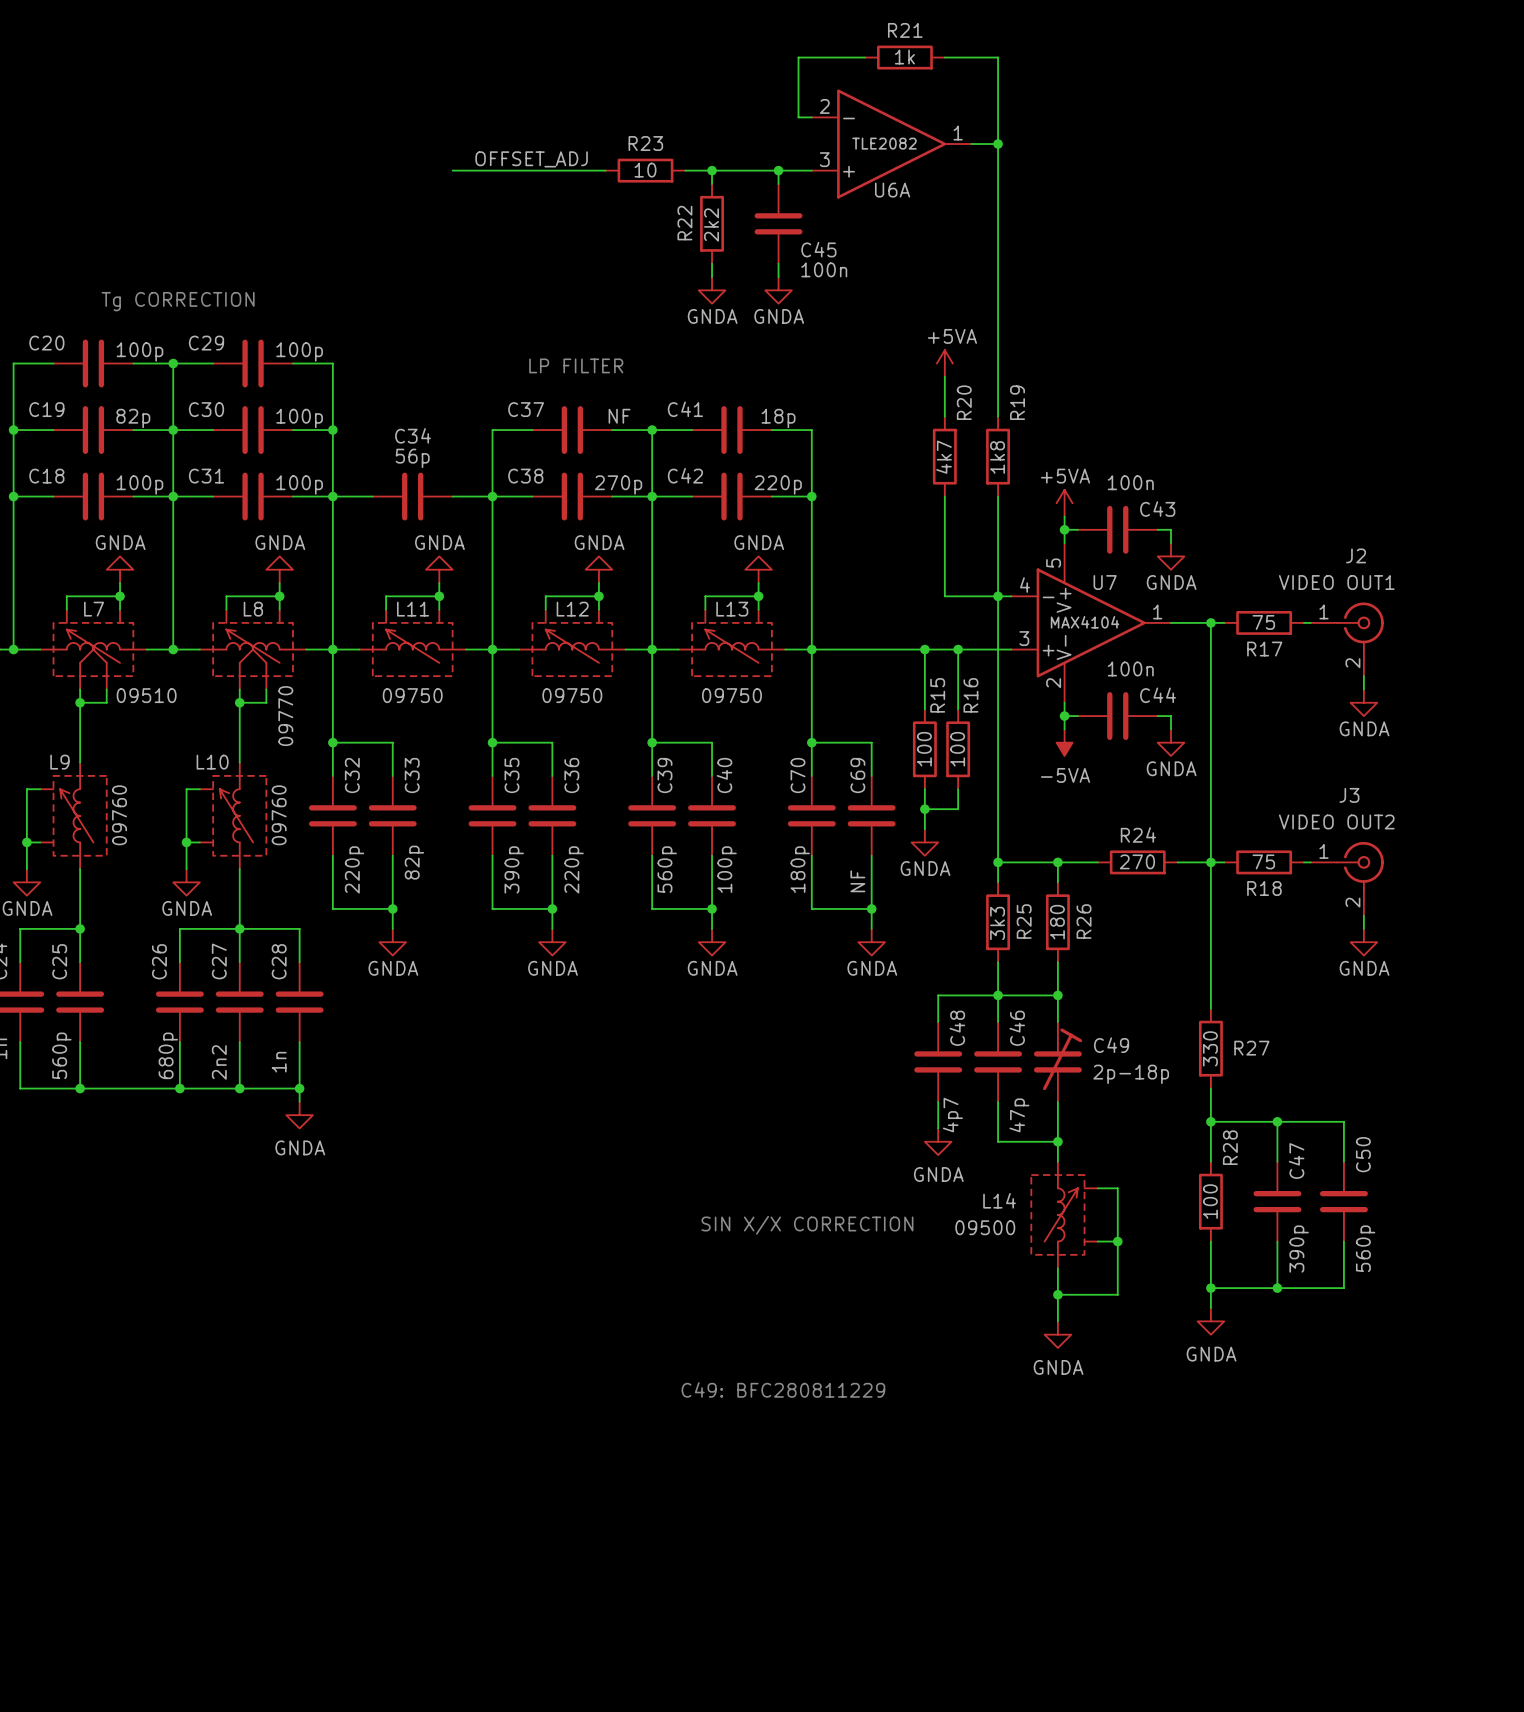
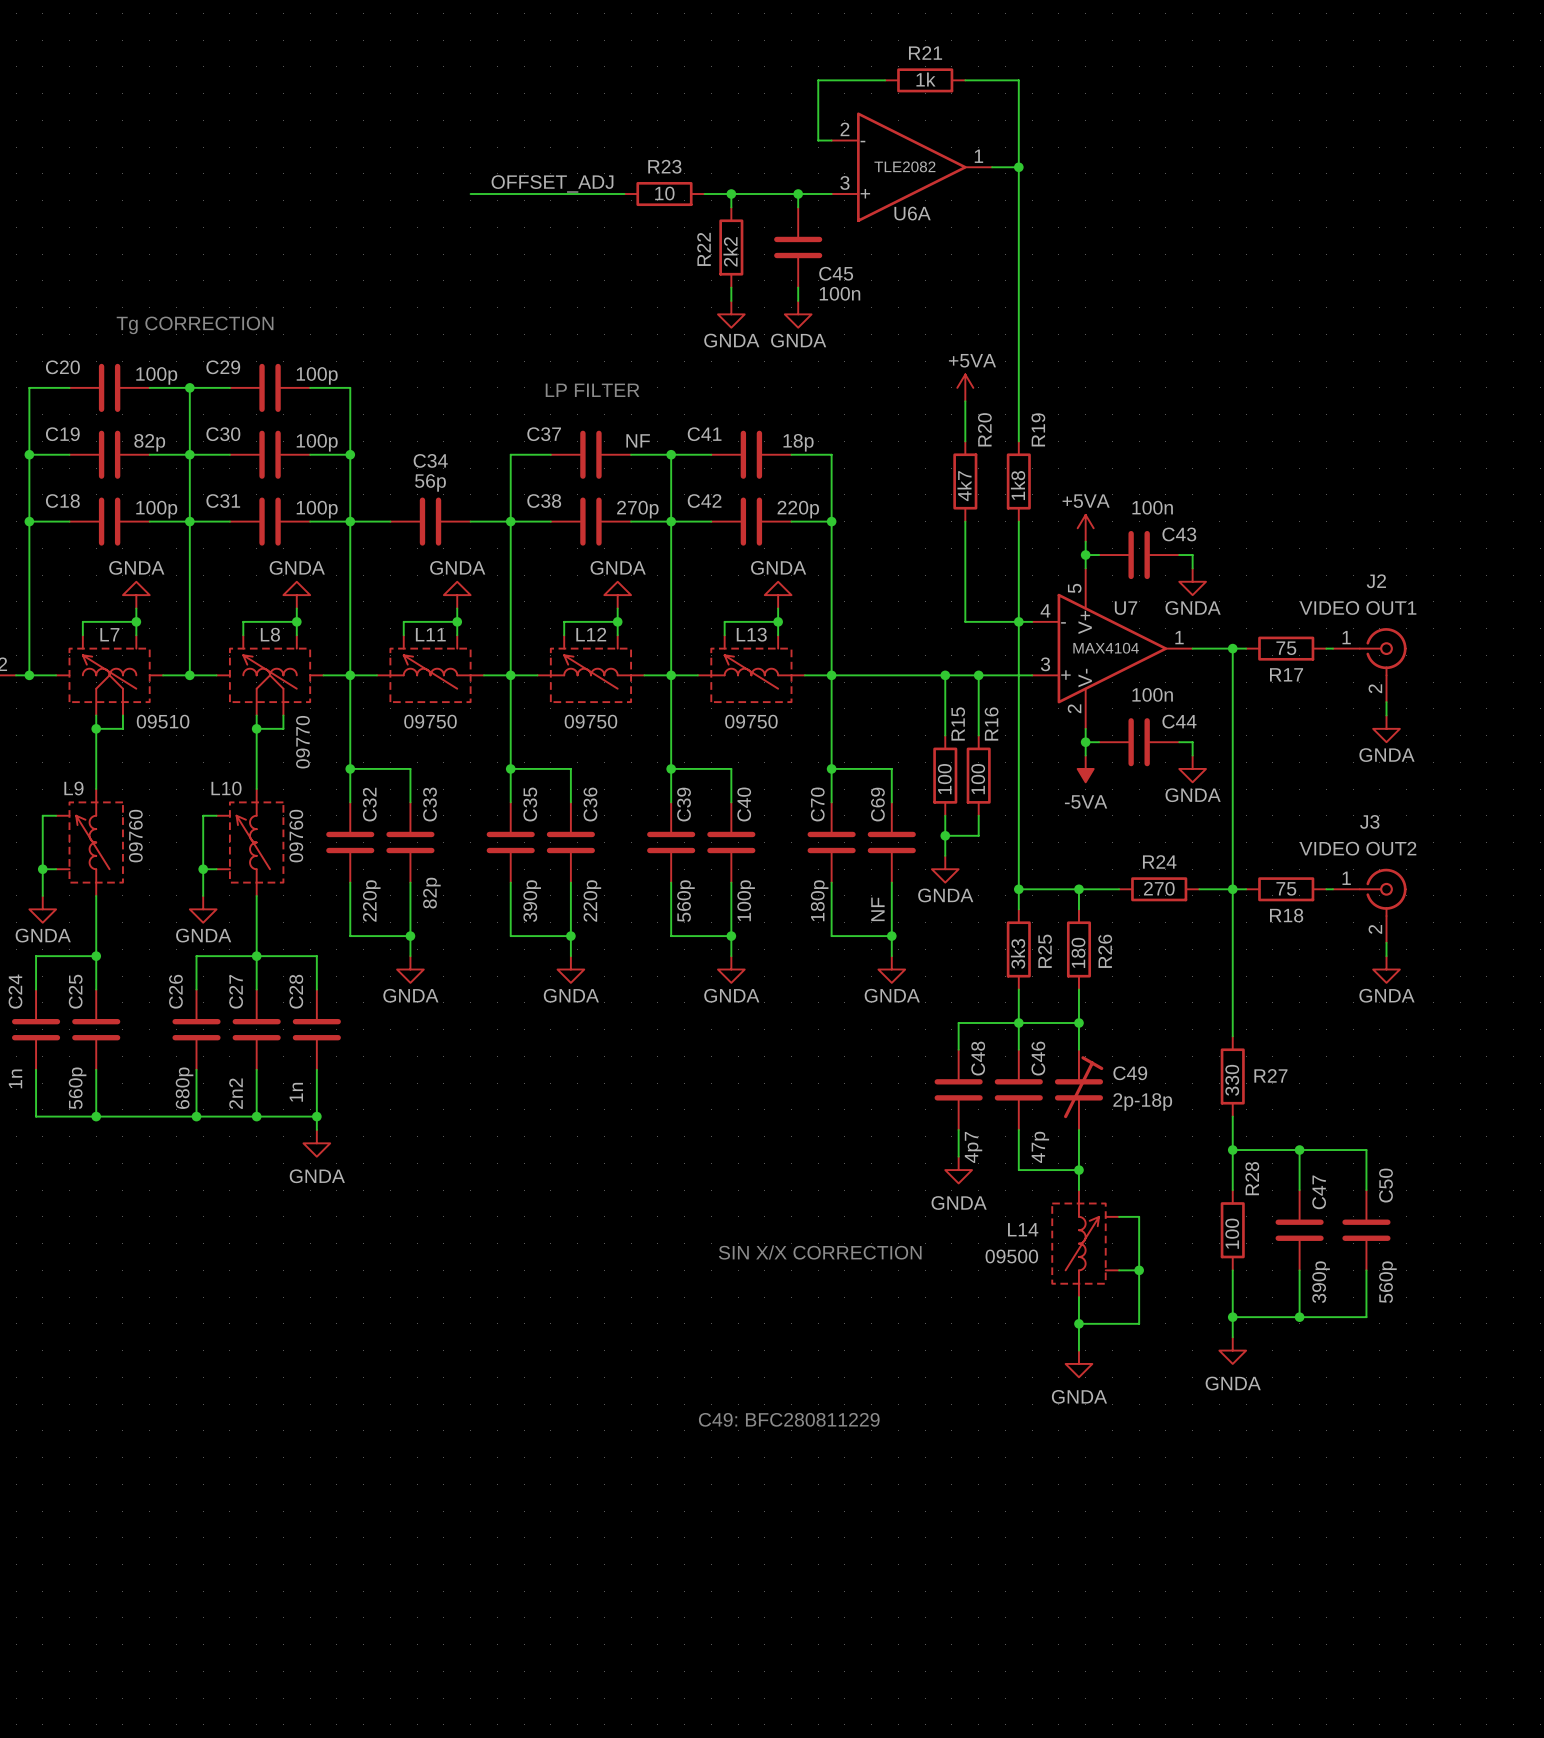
L7 symbol: [40, 609, 147, 690] -> [56, 635, 164, 716]
L8 symbol: [199, 609, 307, 690] -> [216, 635, 324, 716]

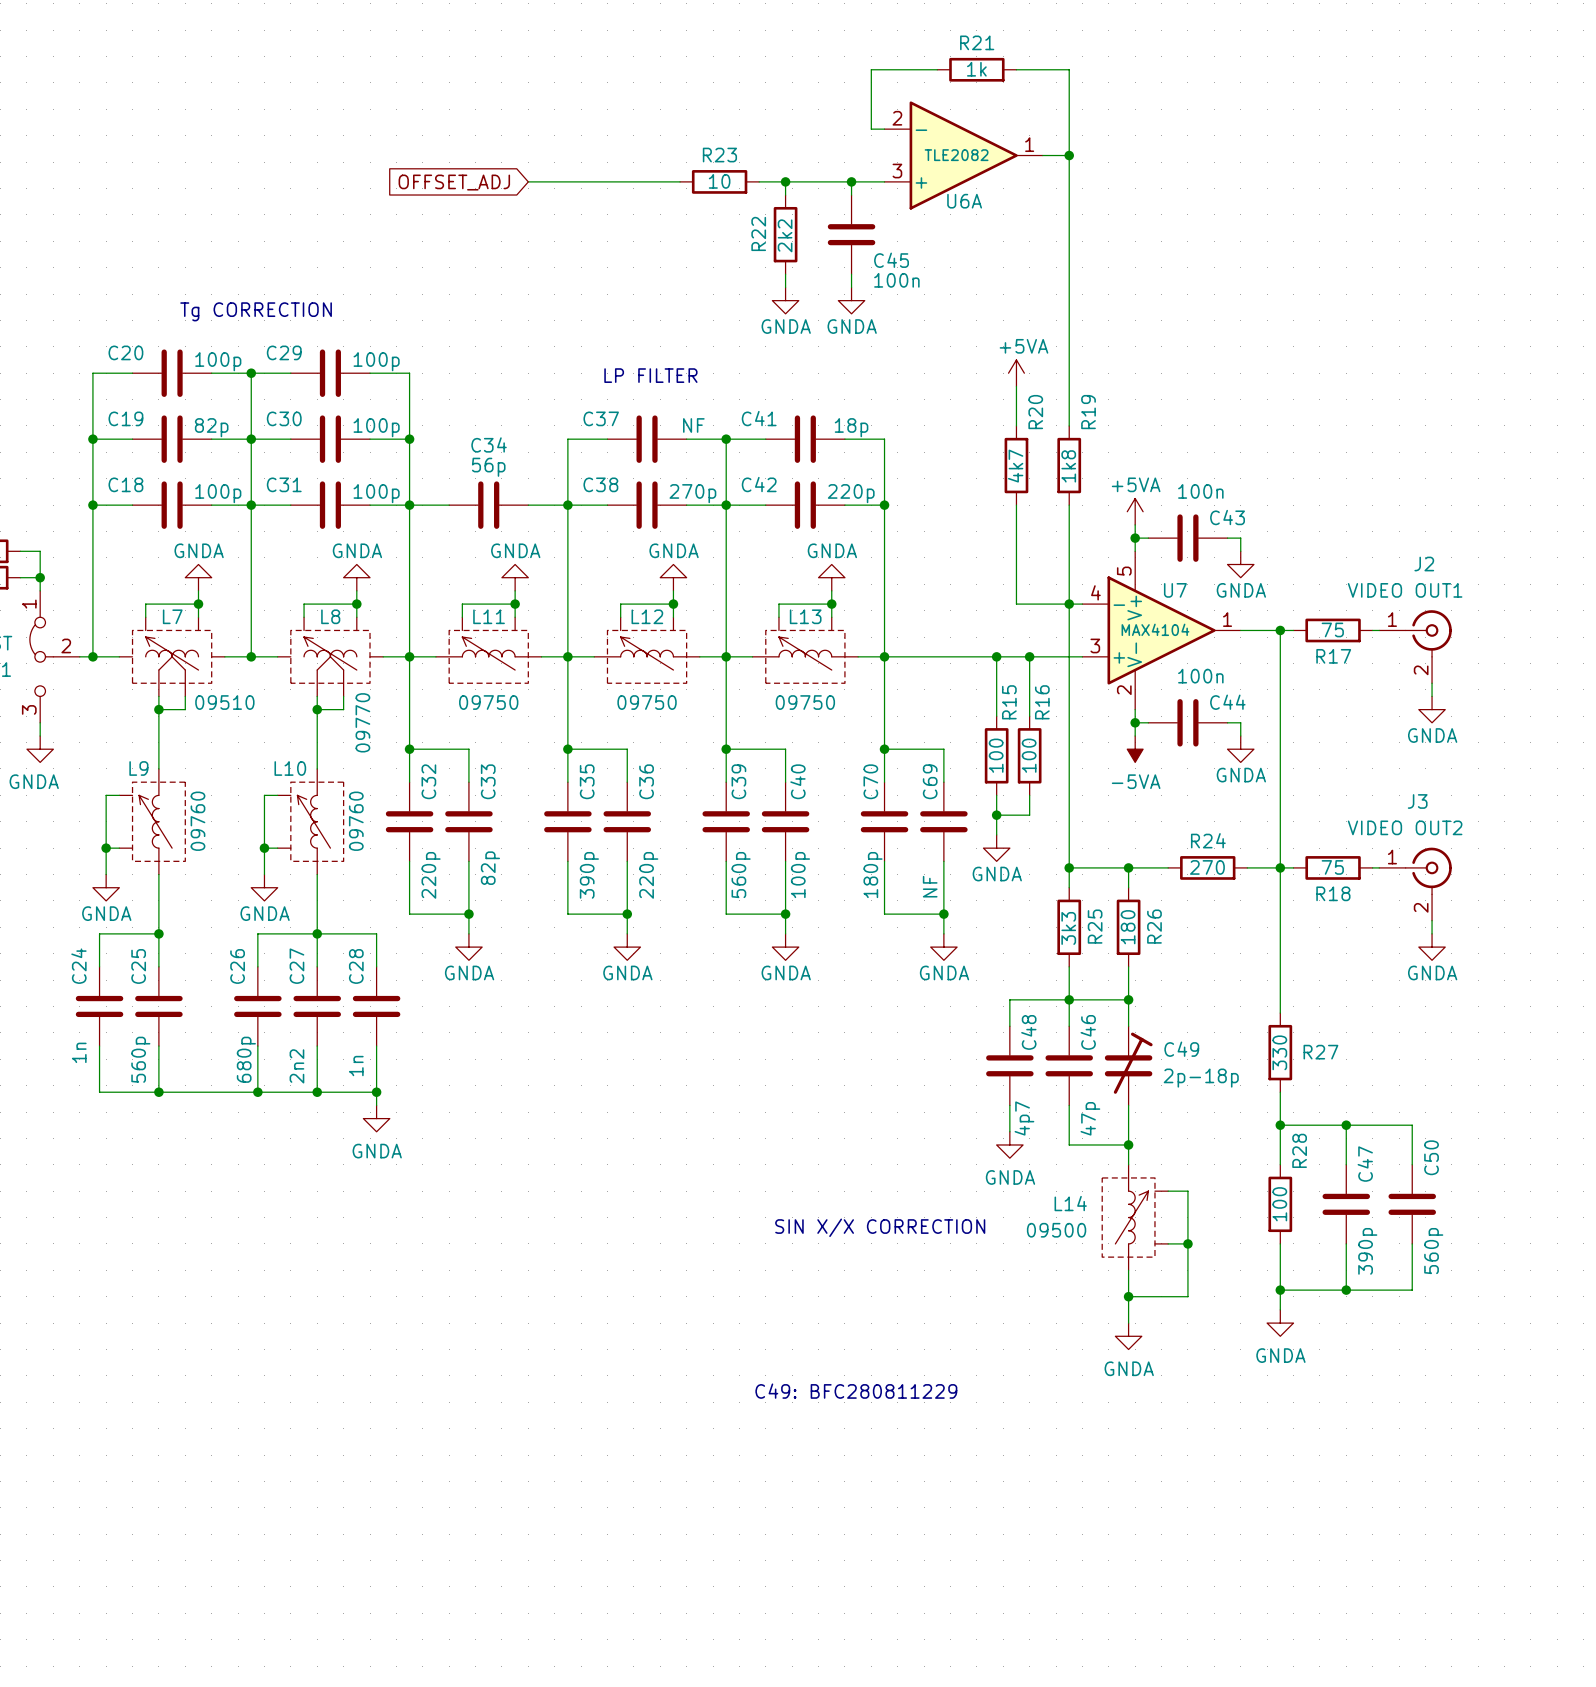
label: OFFSET_ADJ (552, 183) -> none
global label: none -> OFFSET_ADJ (454, 182)

